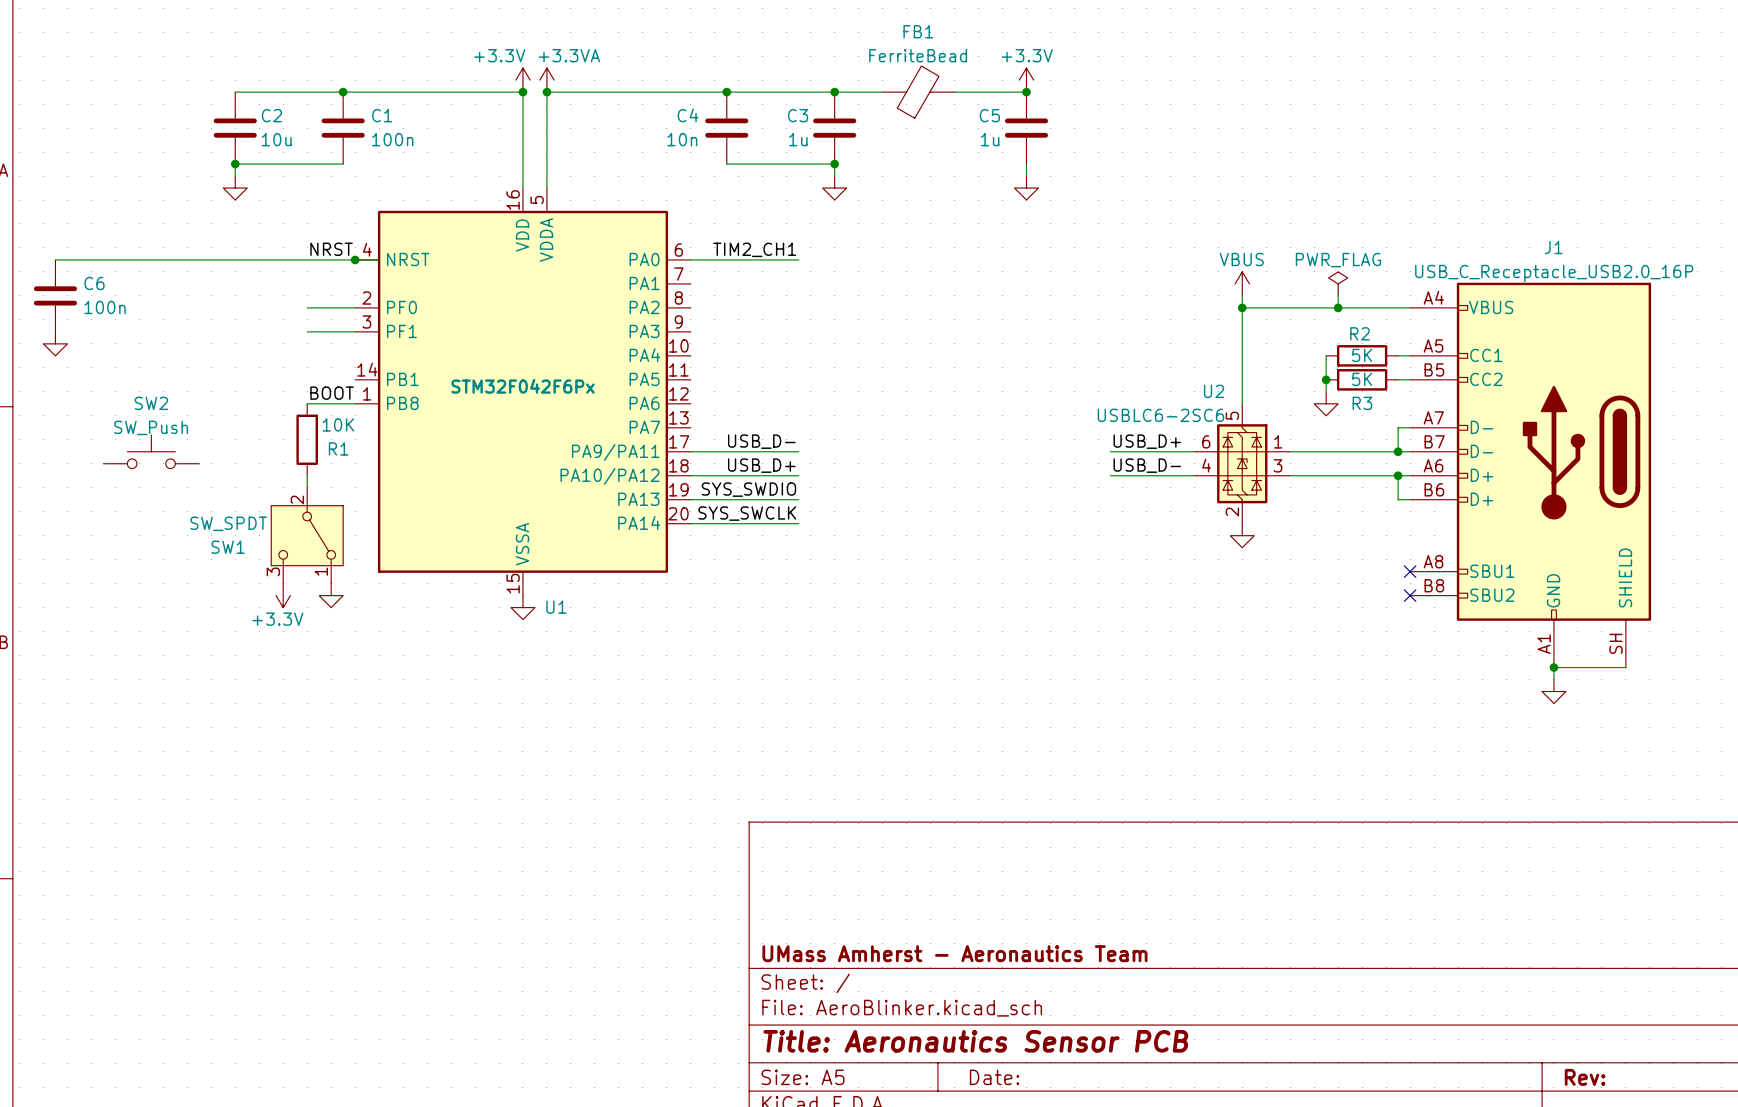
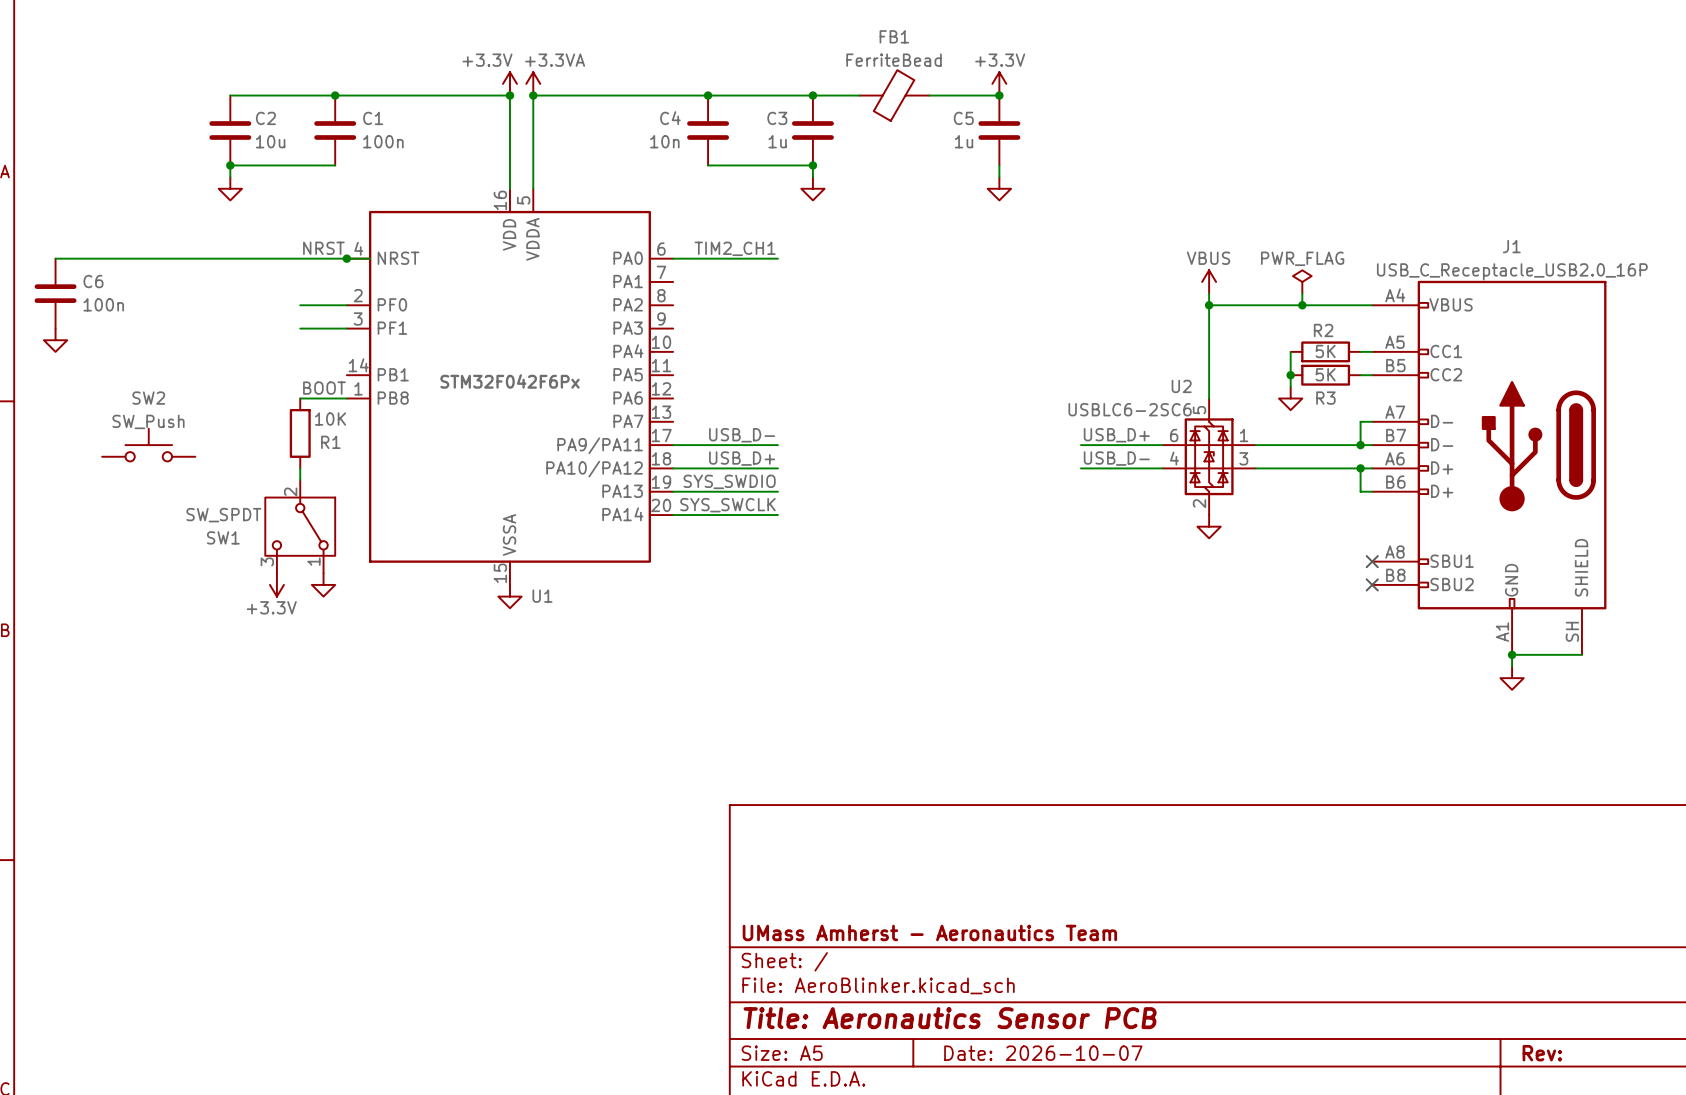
title block: Date: (994, 1077) -> Date: 2026-10-07 (1043, 1053)

